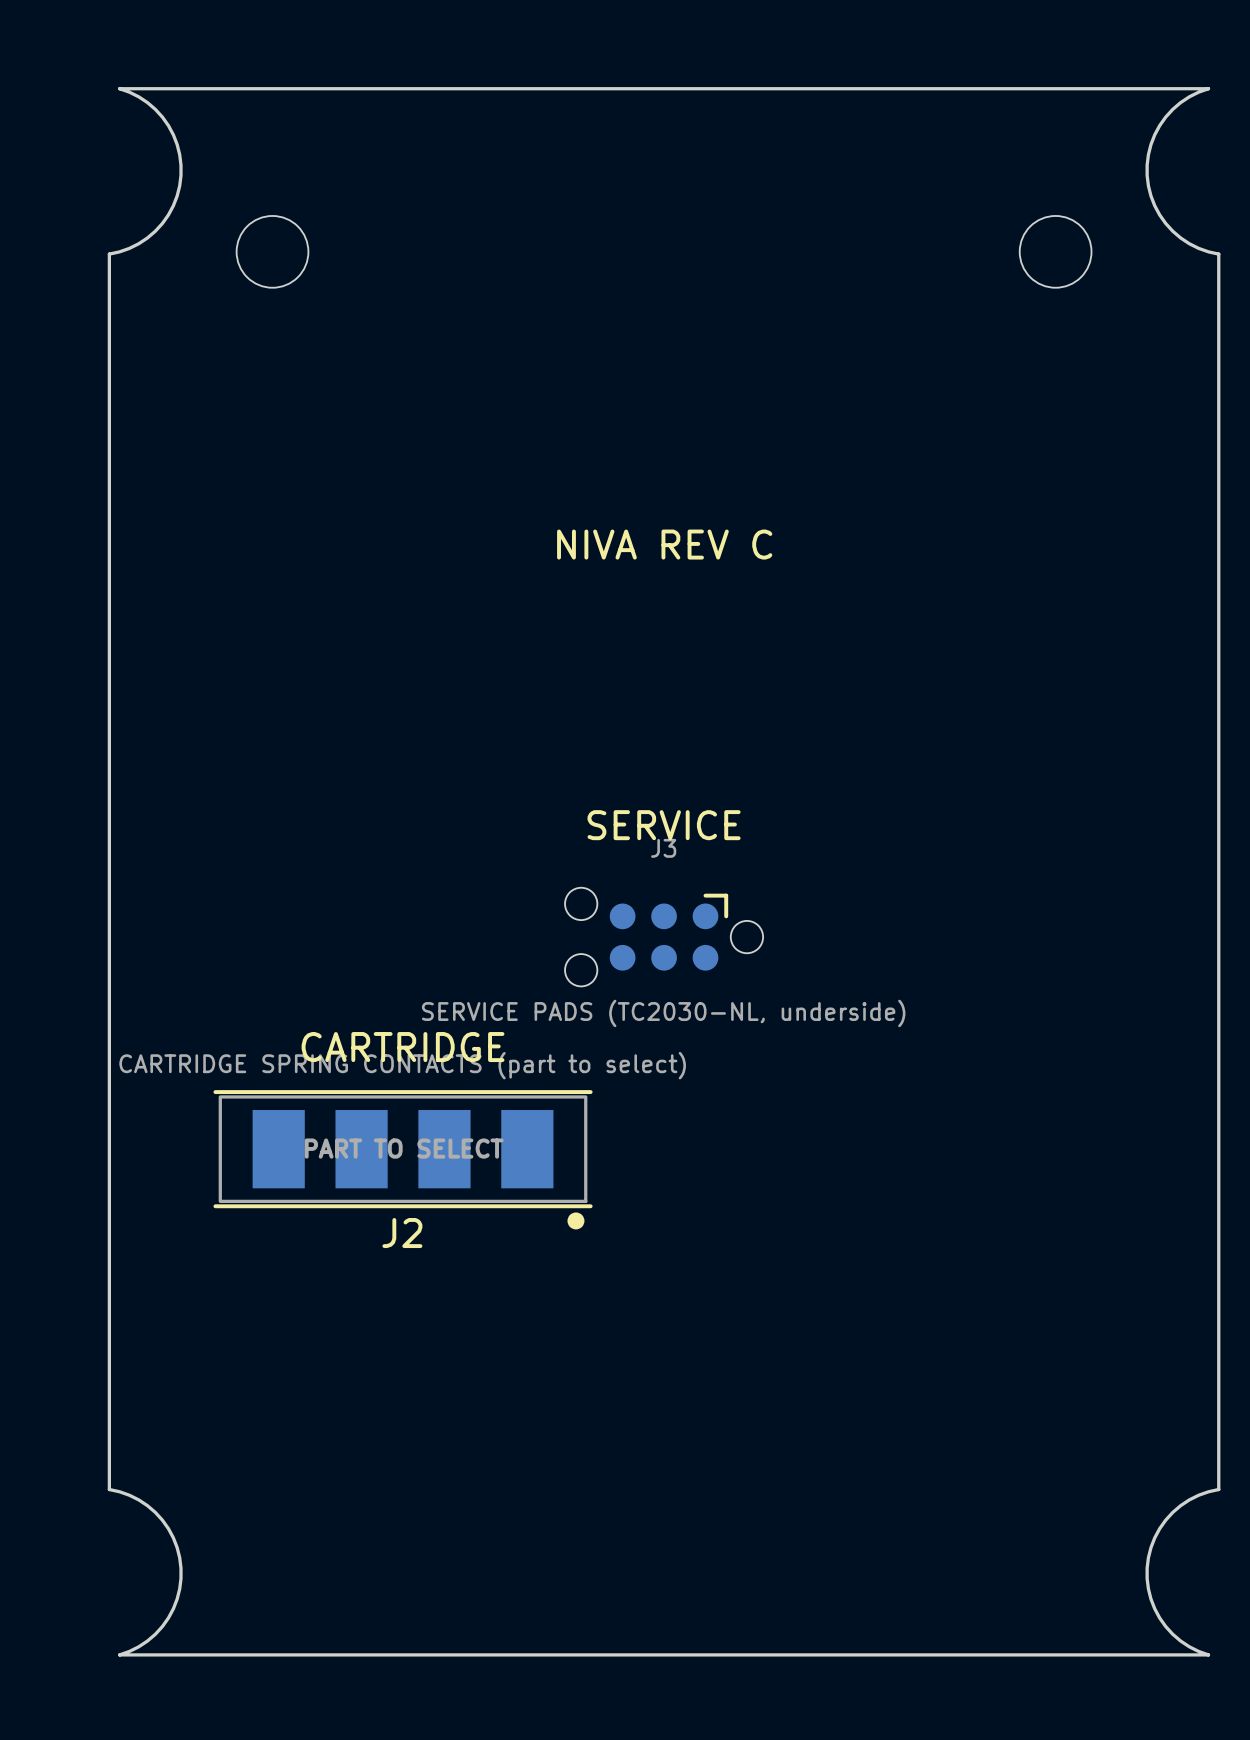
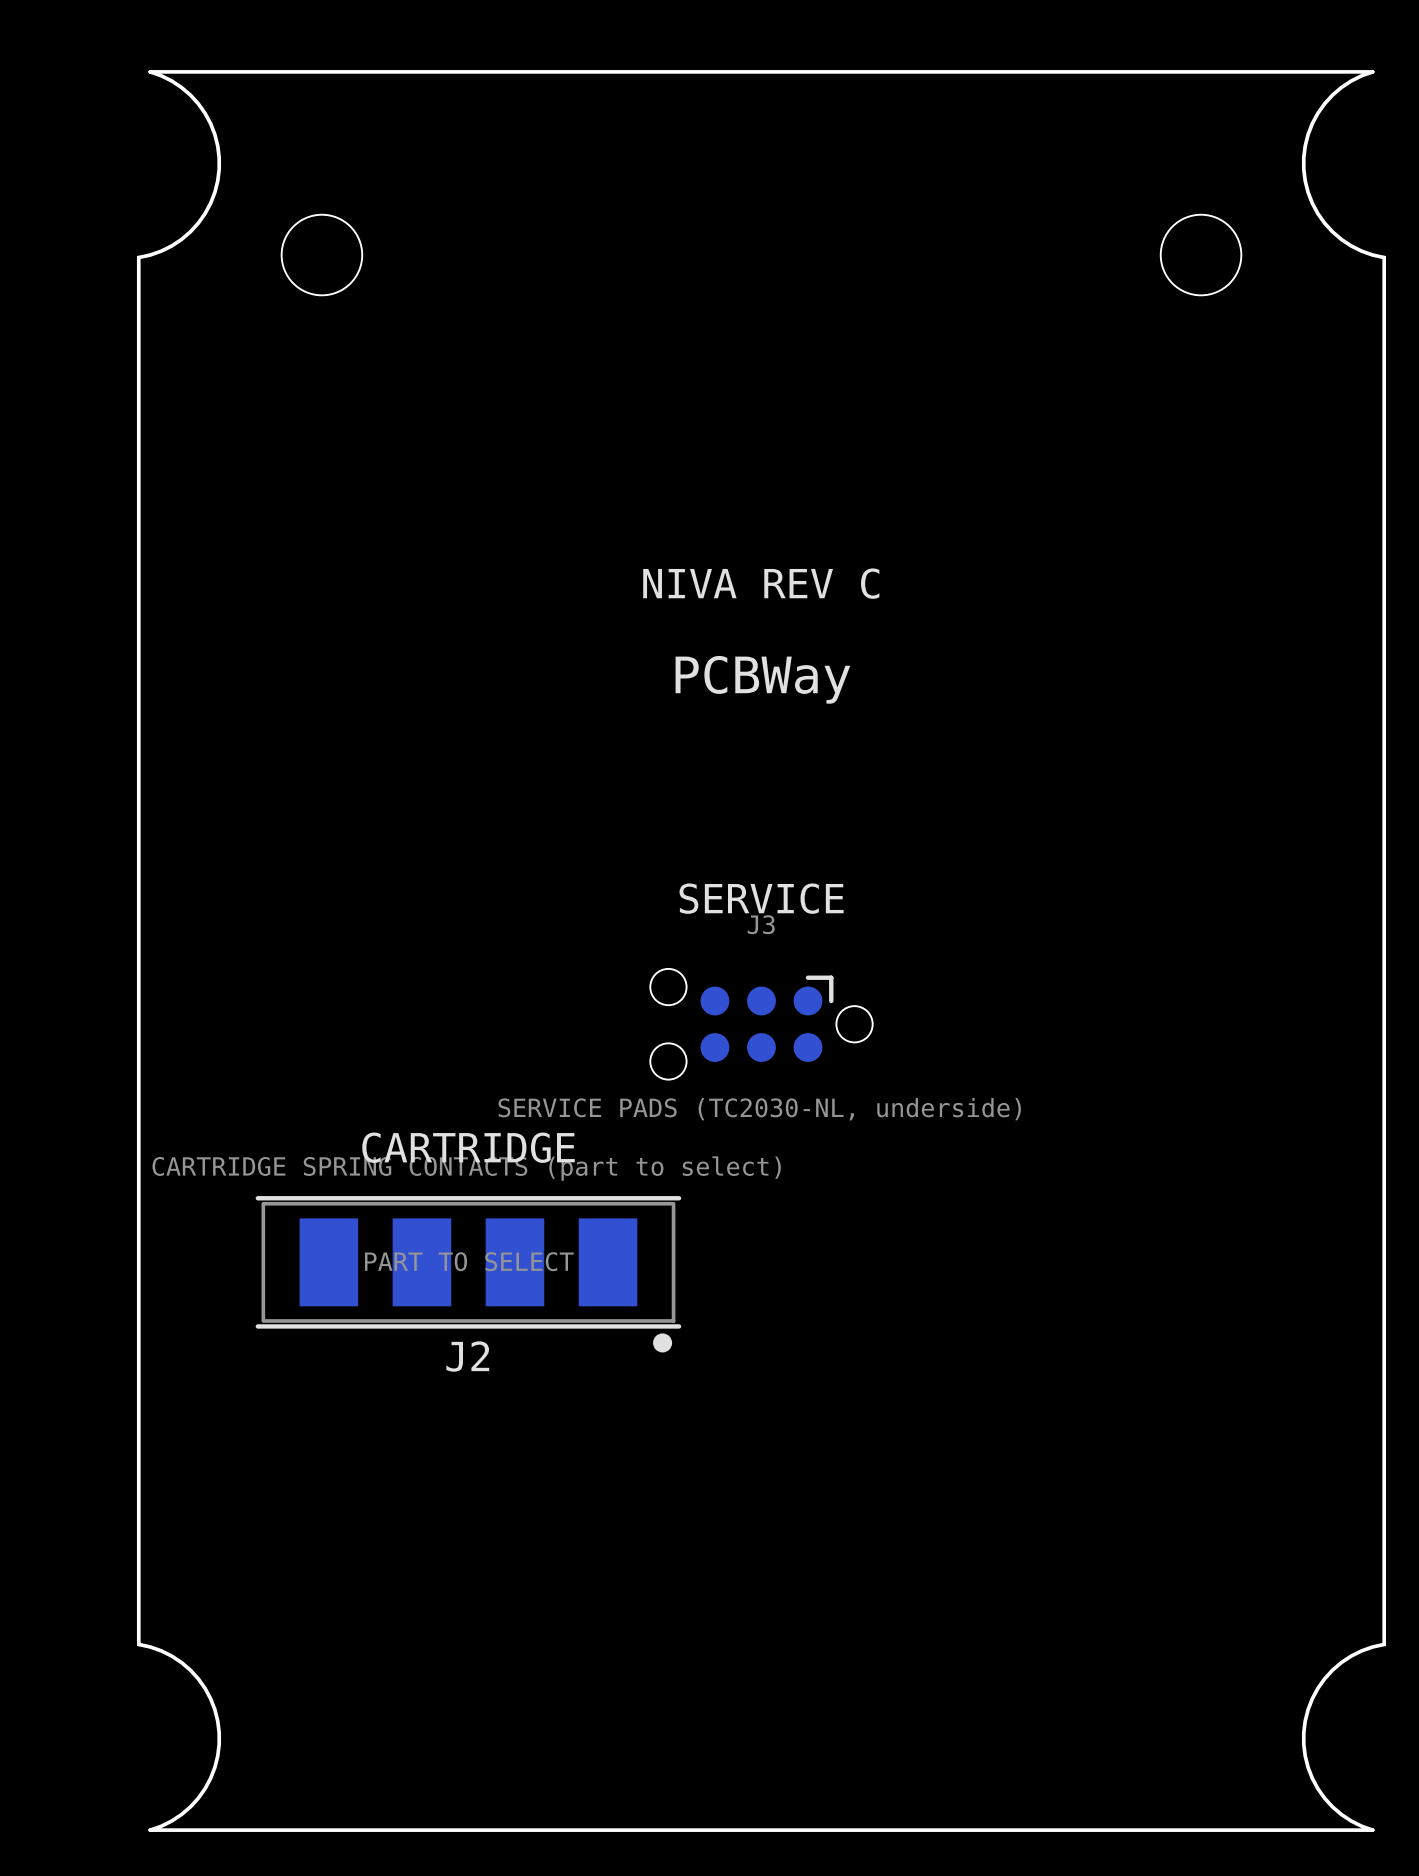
text: none -> PCBWay (762, 679)

